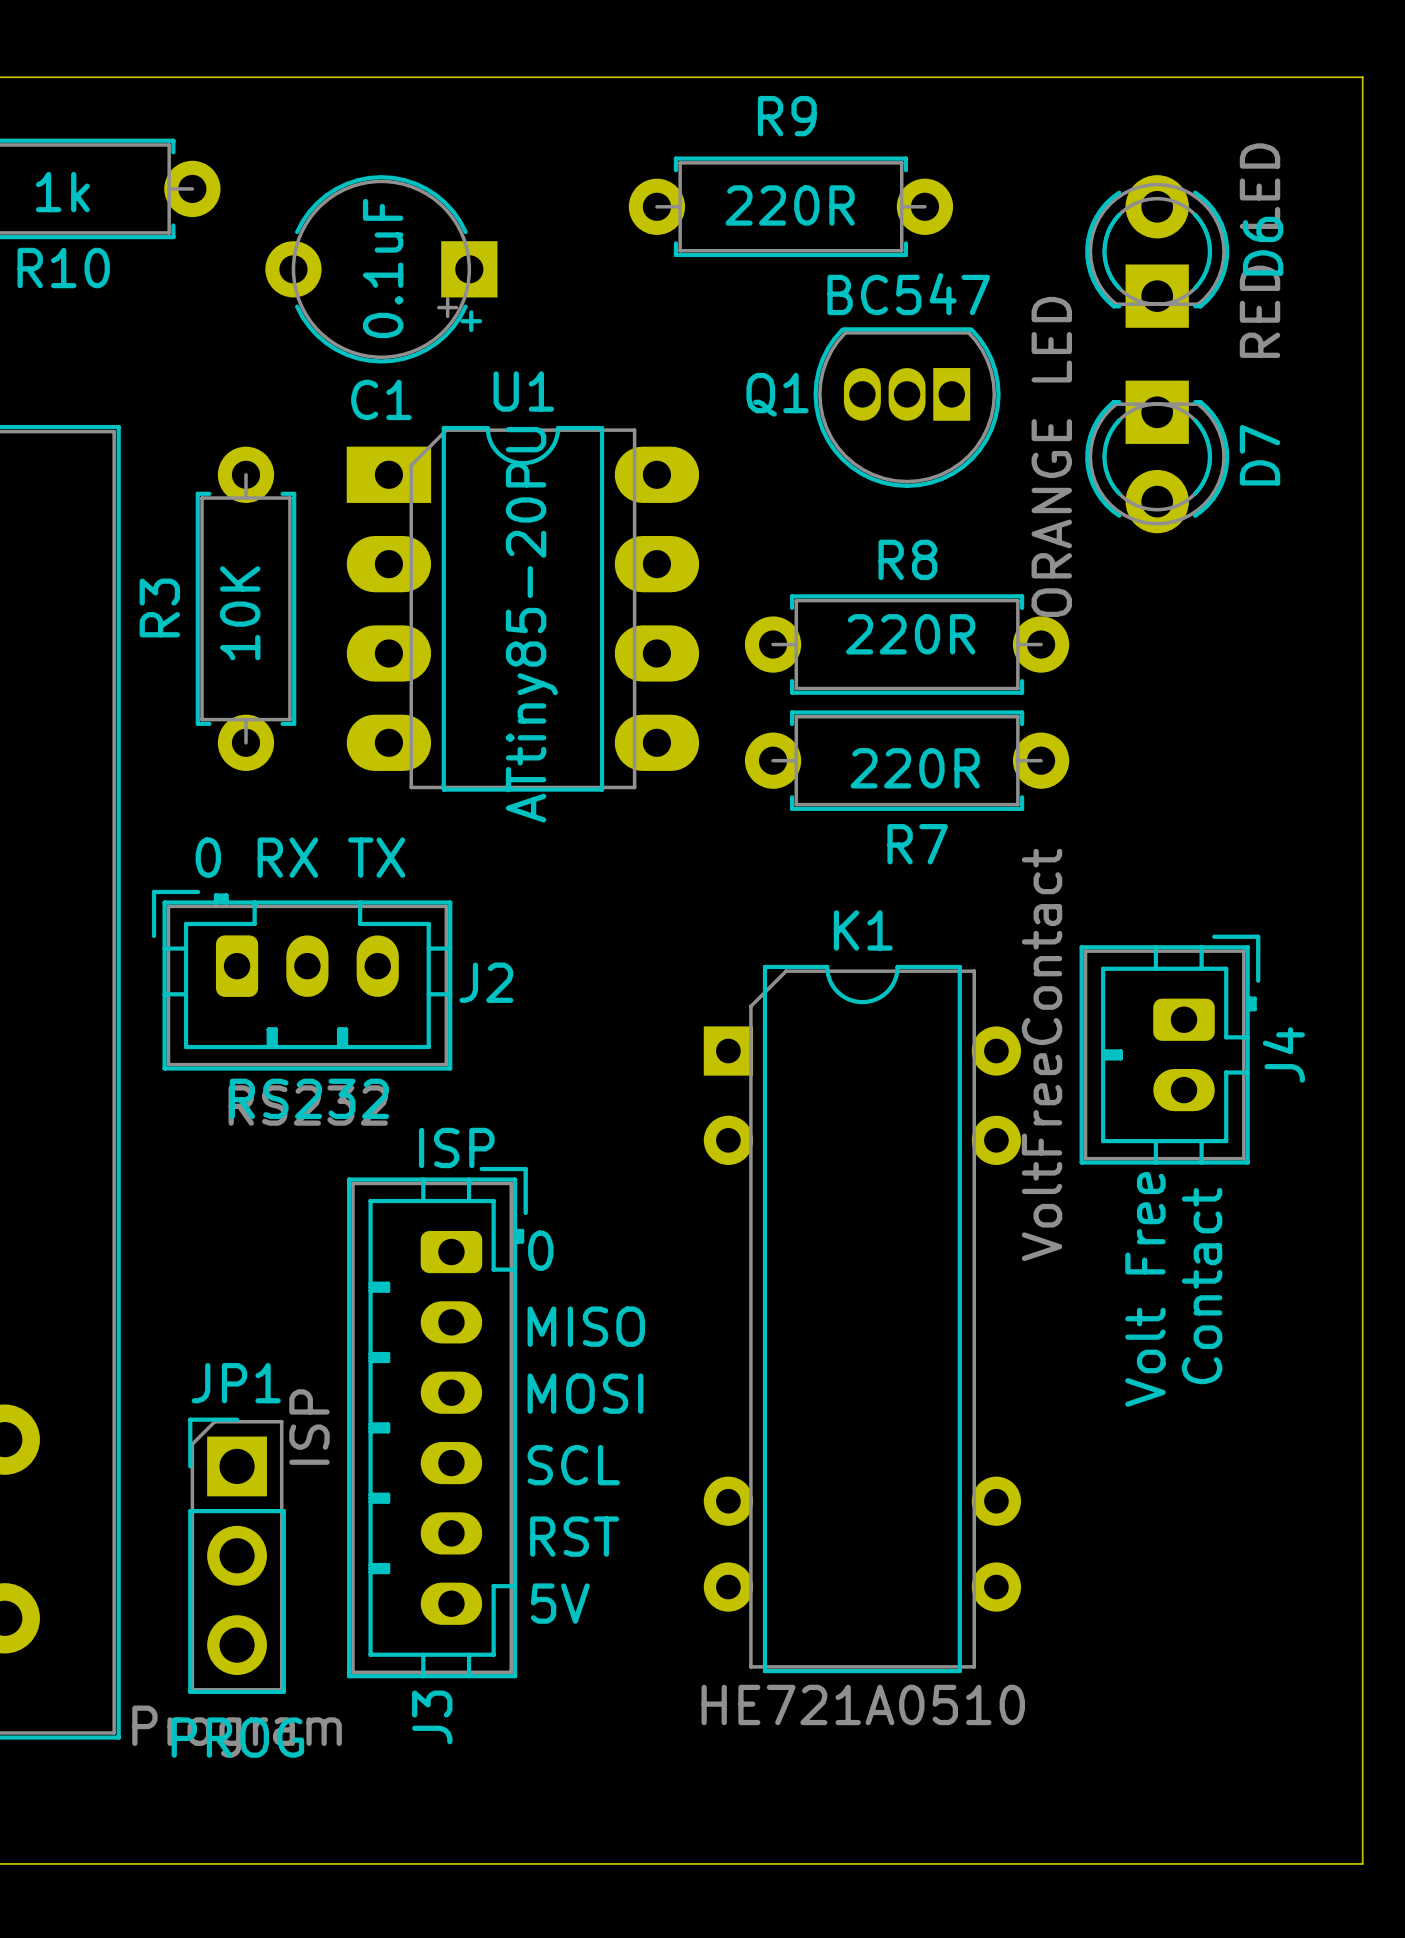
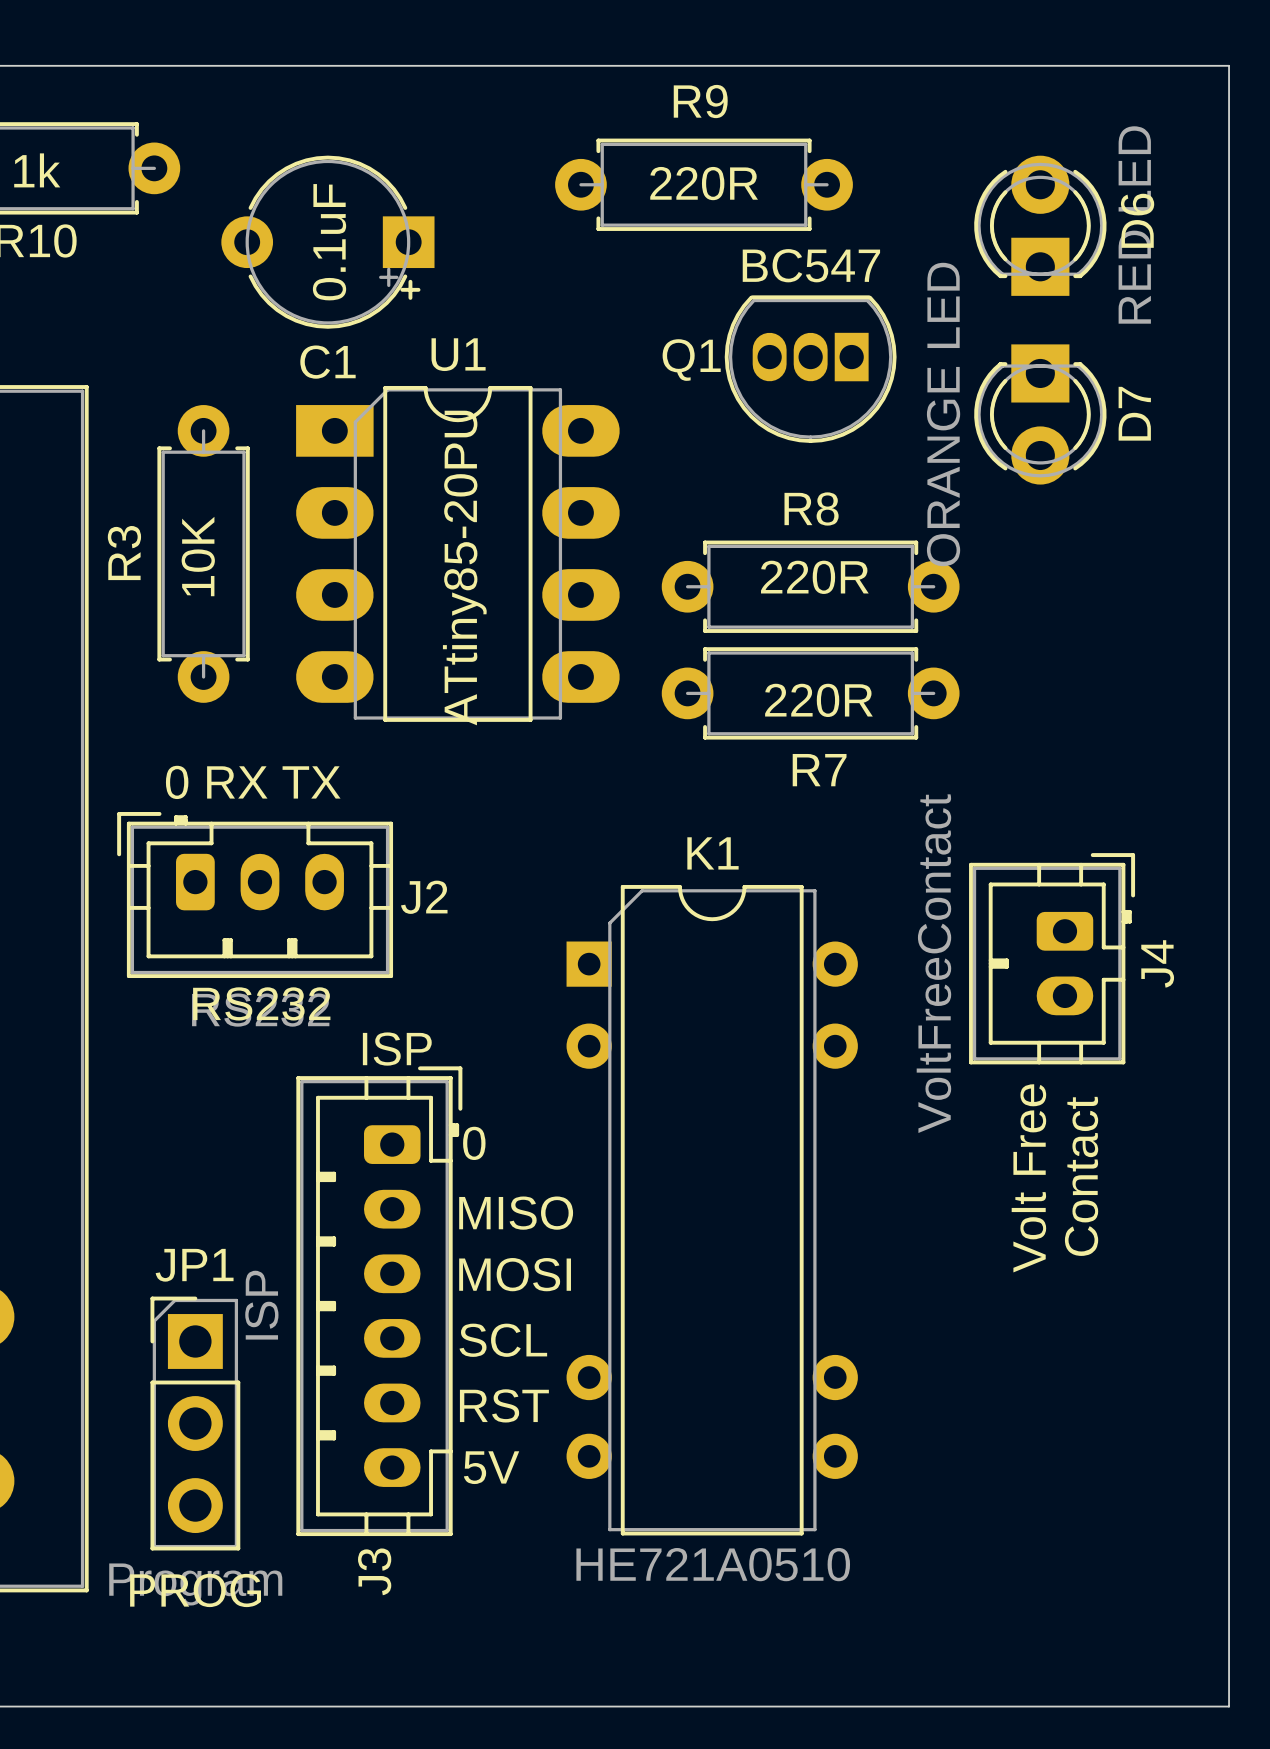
K1 position: (862, 1319) -> (712, 1210)

